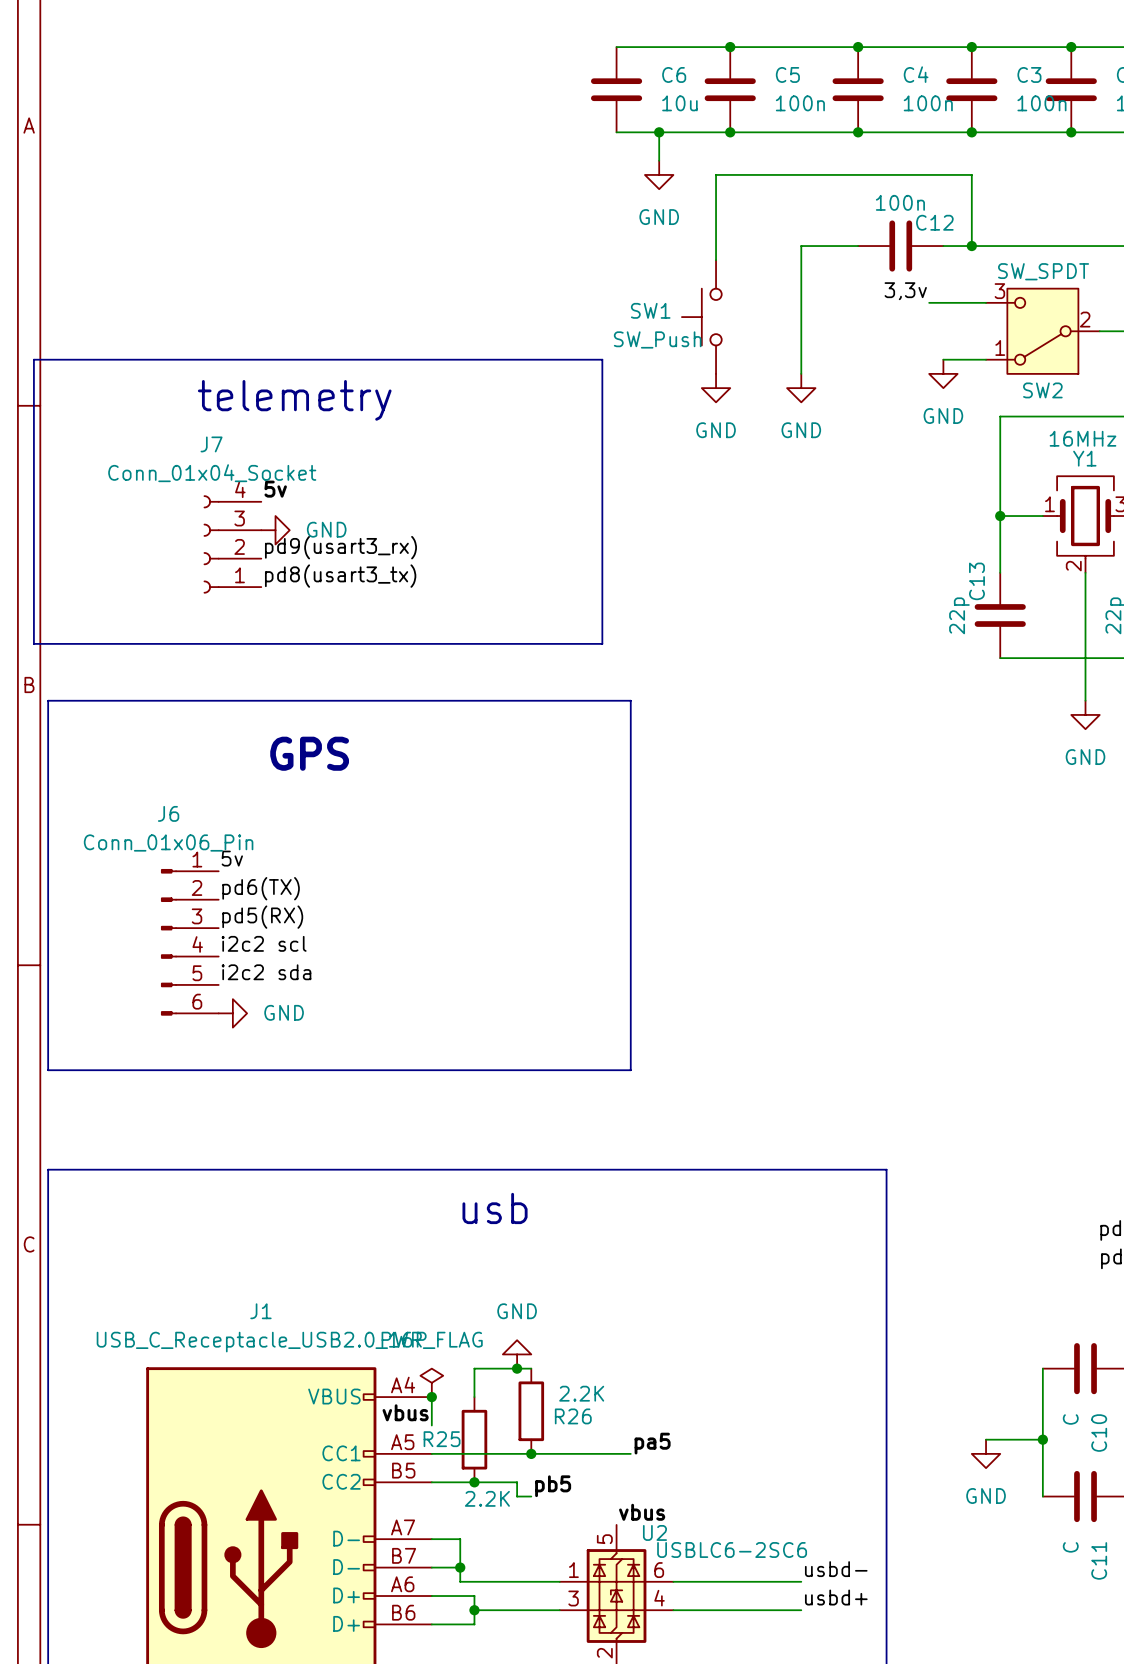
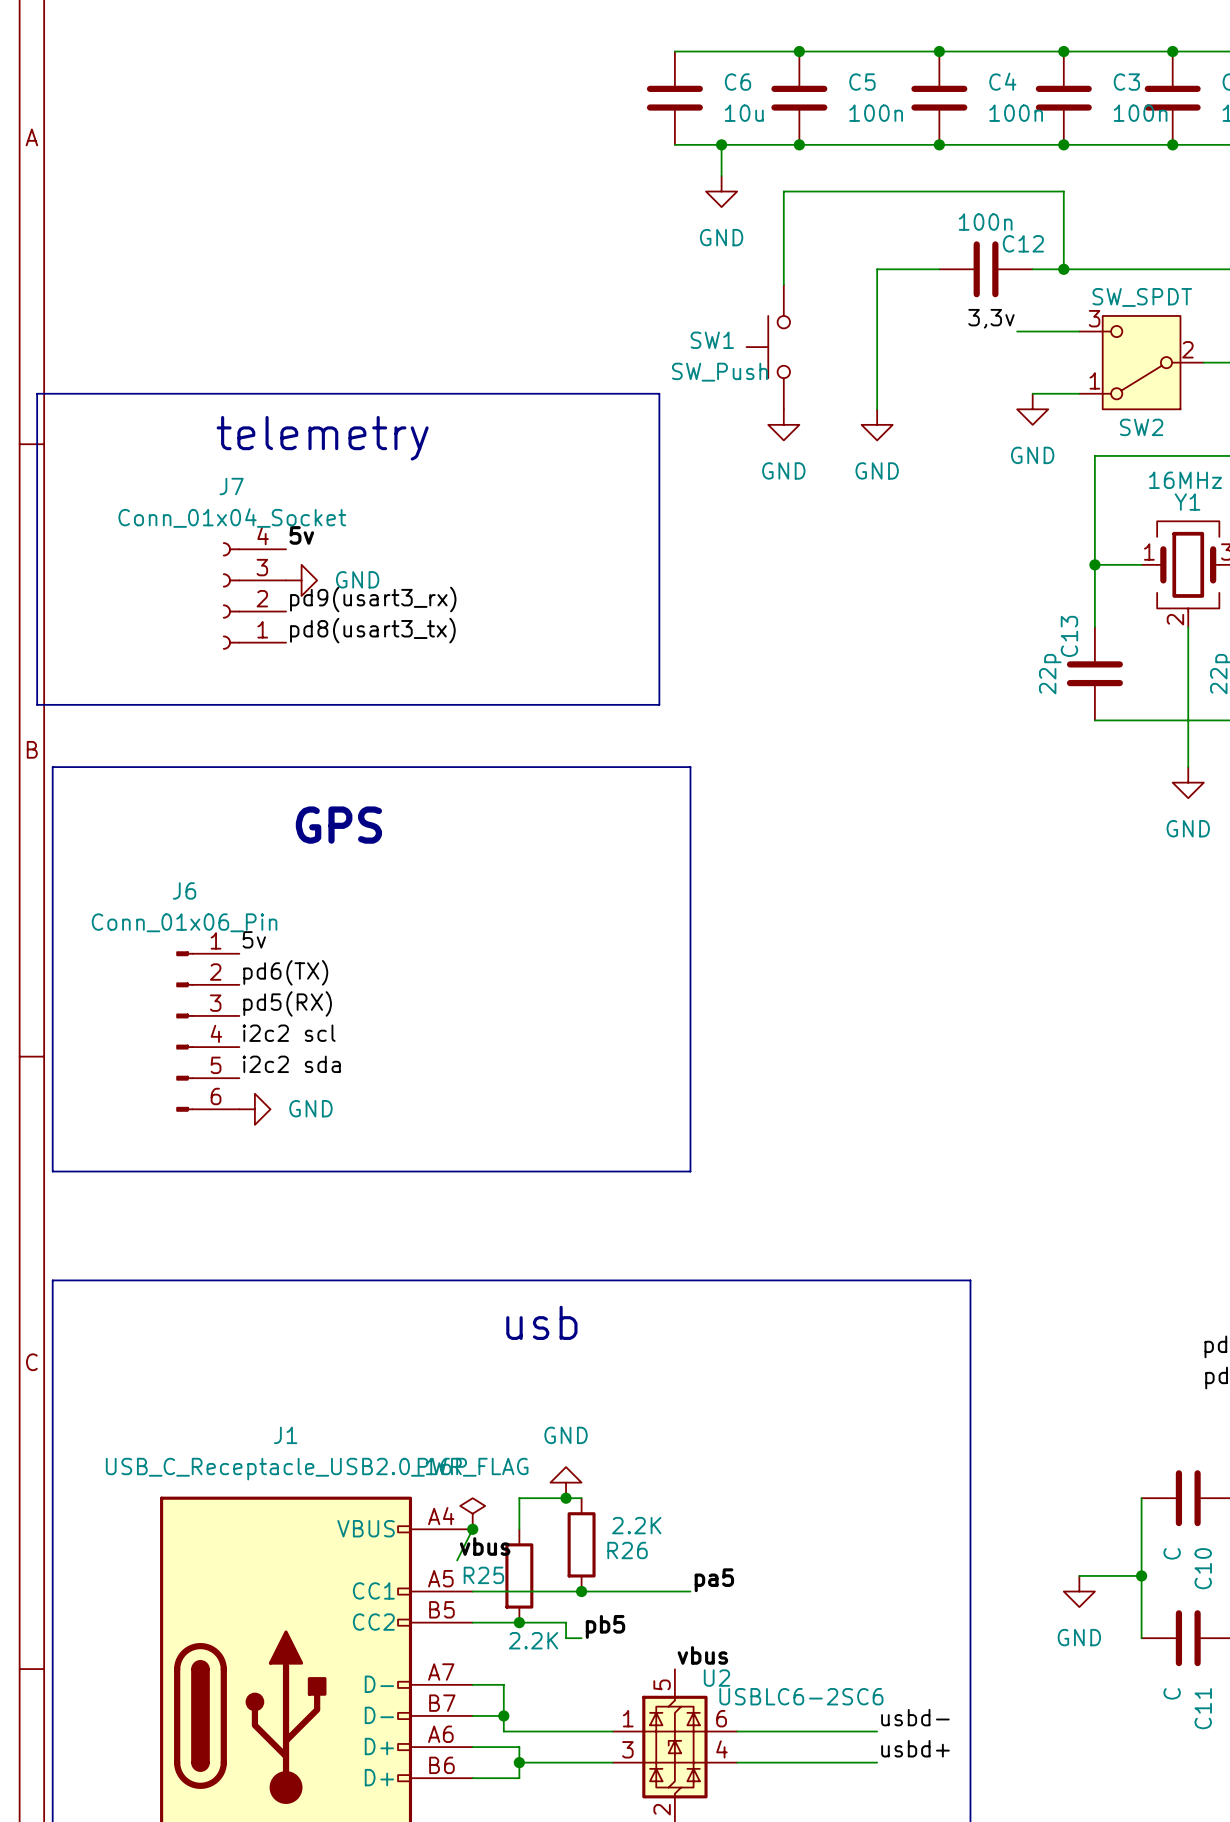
wire: (431, 1397) (431, 1425) -> (472, 1529) (457, 1560)
label position: vbus (405, 1412) -> vbus (485, 1546)

